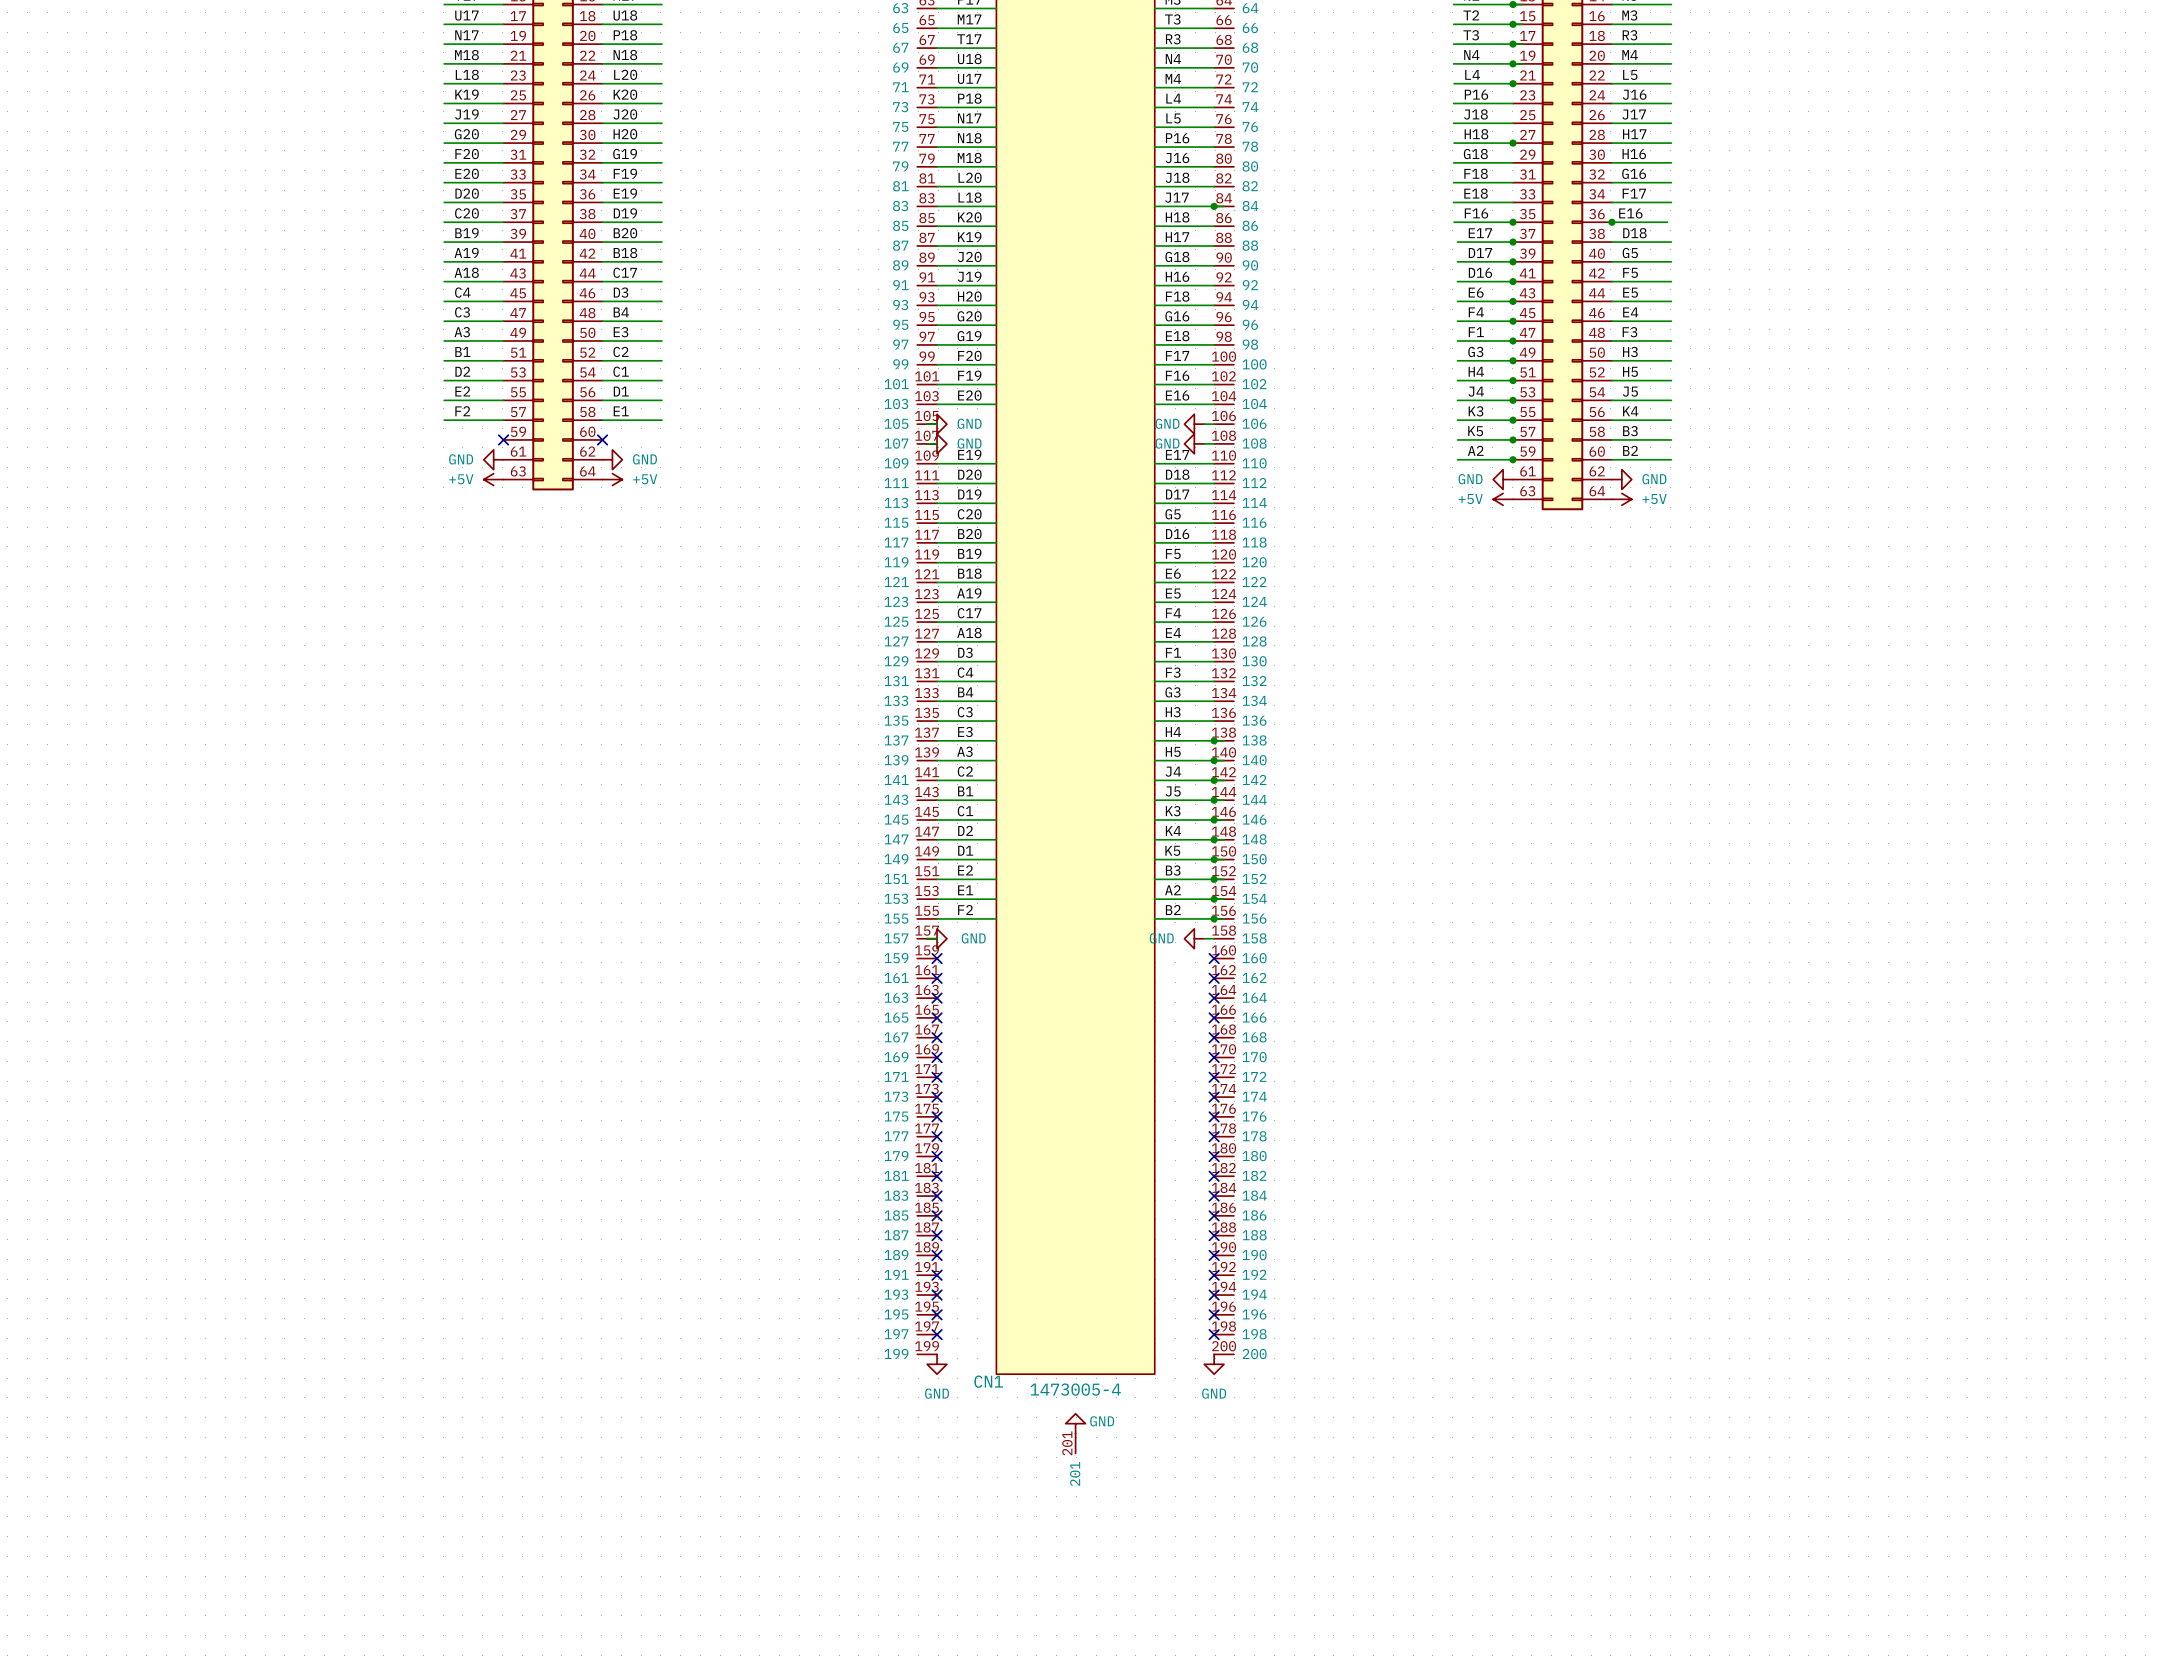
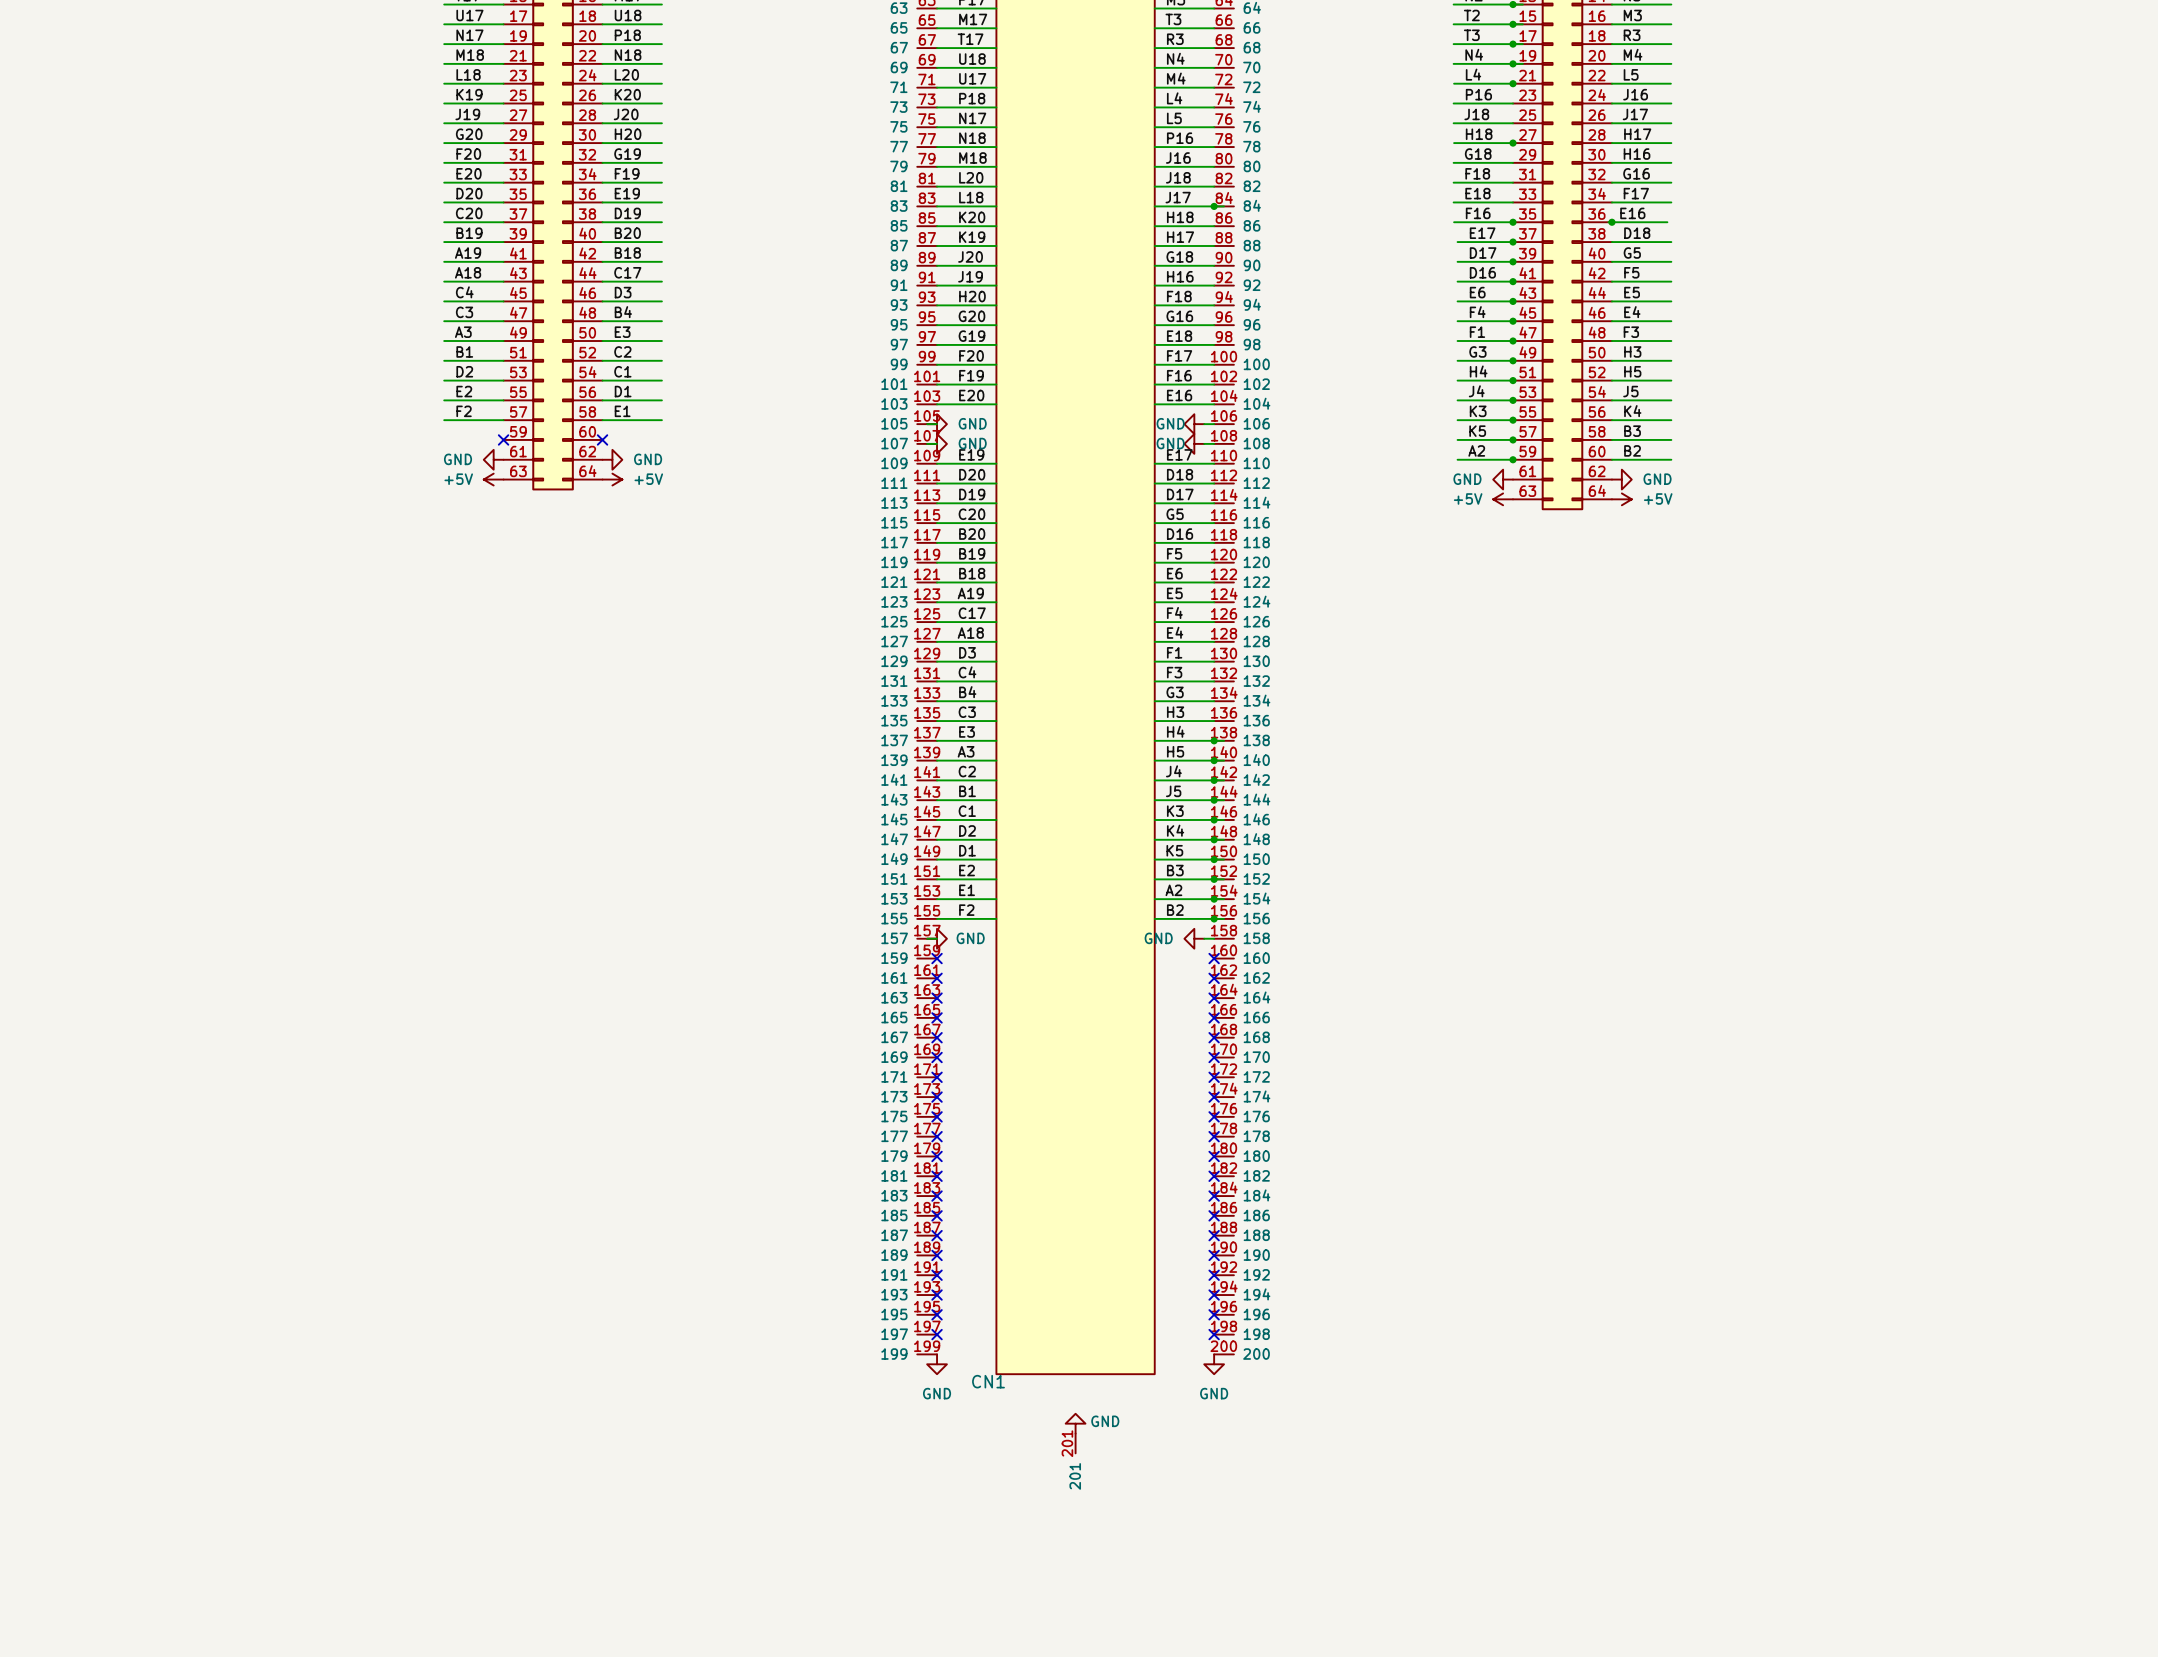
CN1 value: 1473005-4 (1075, 1389) -> none

